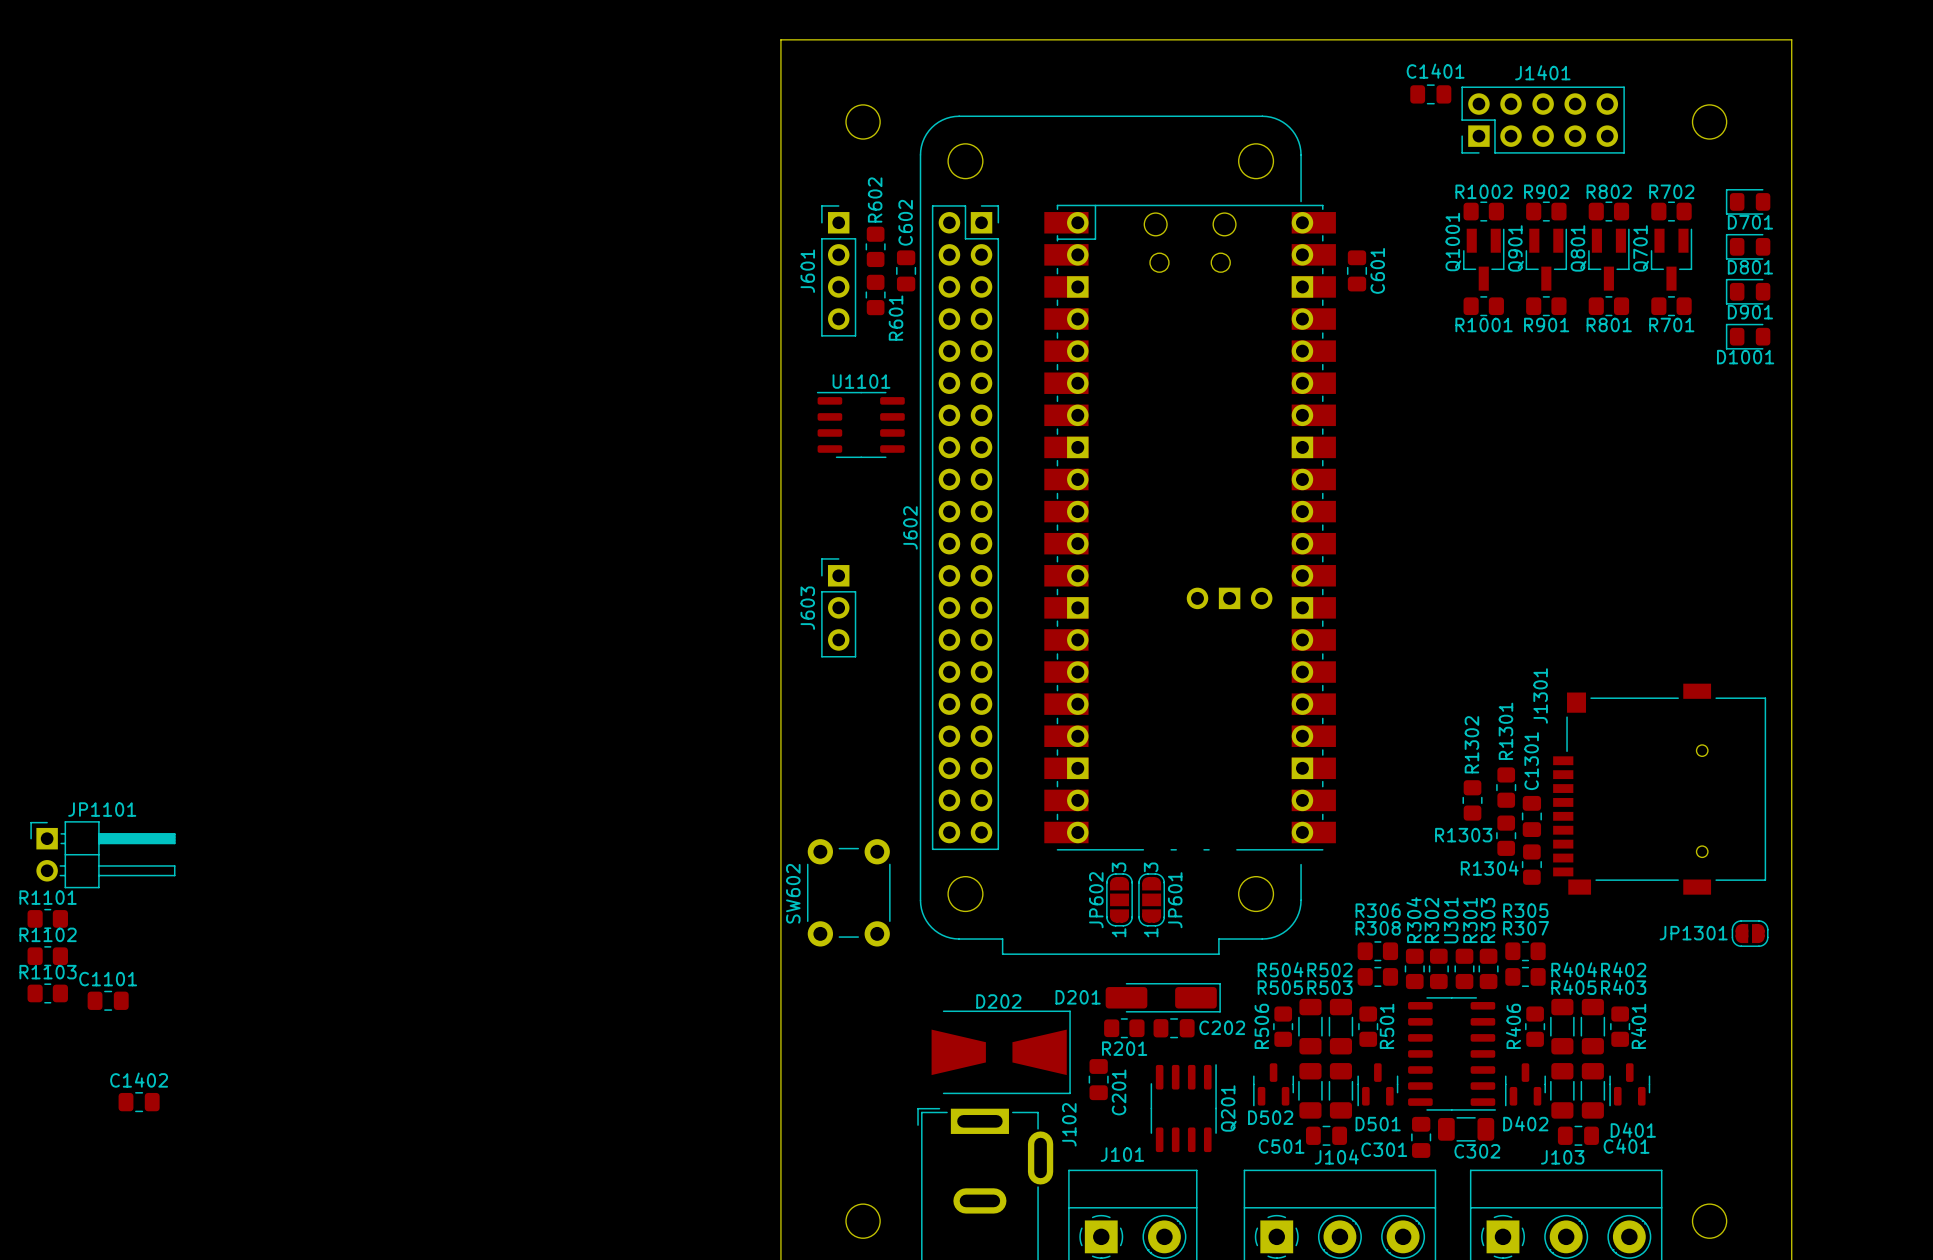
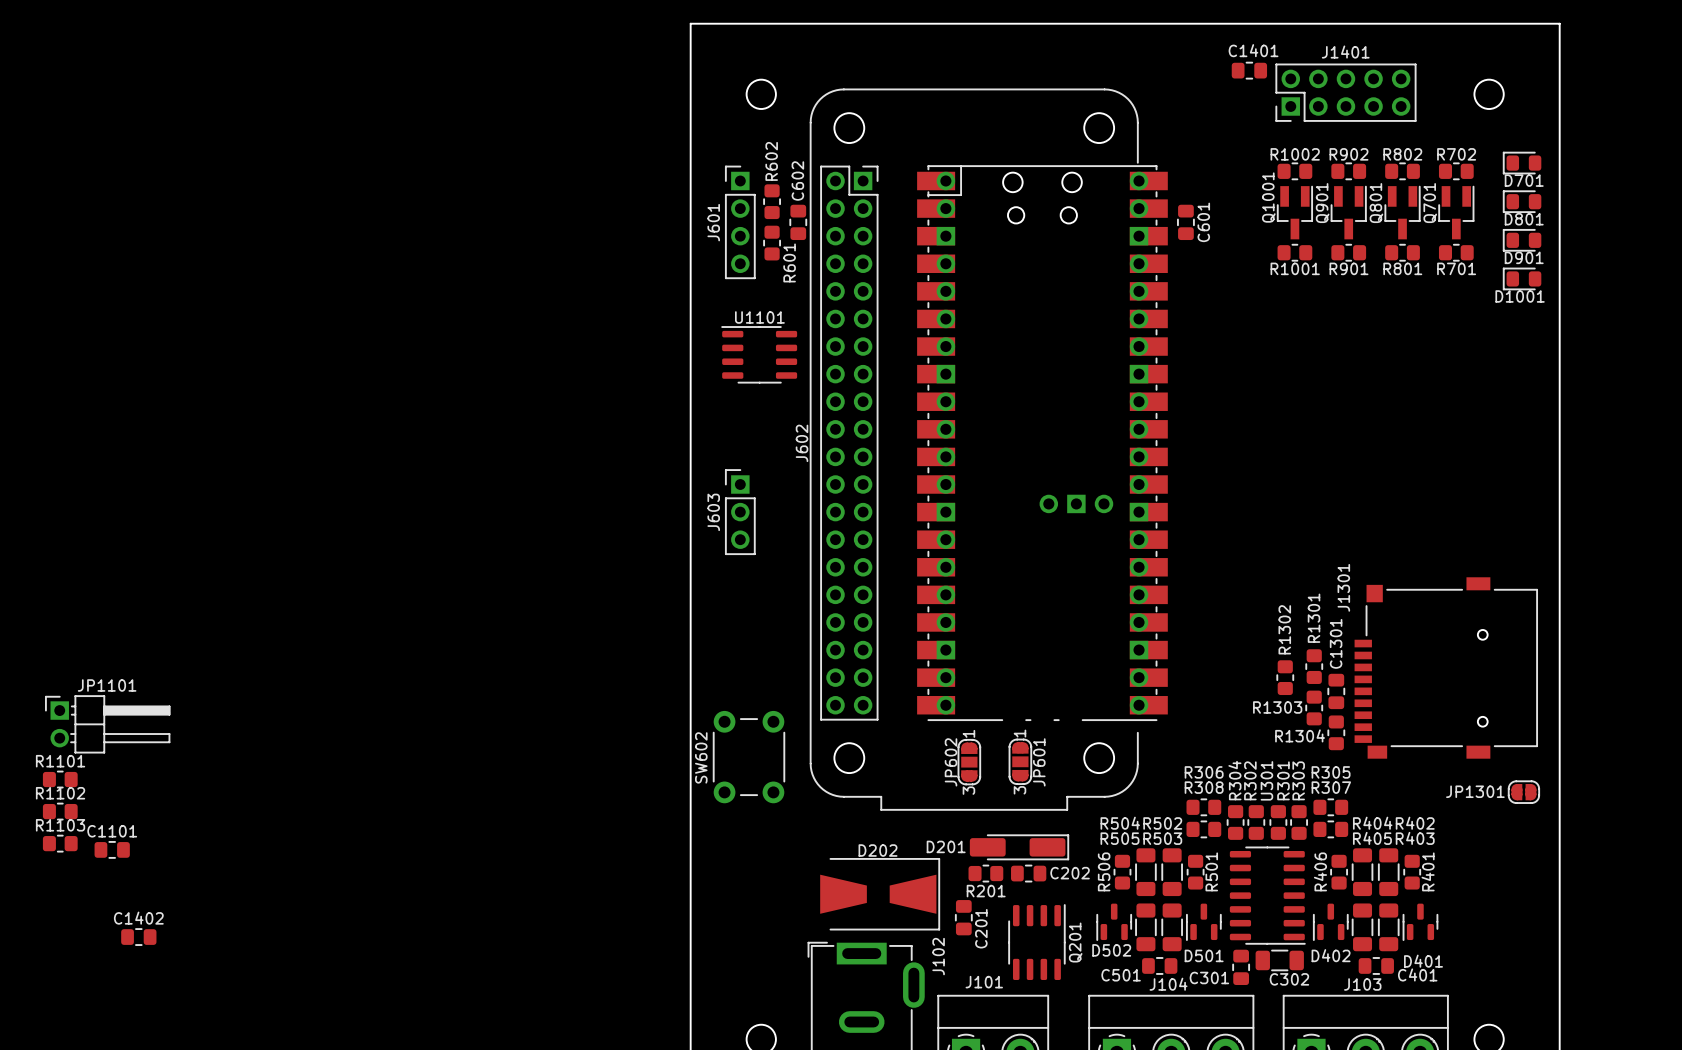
JP602 rotation: 0° (1119, 899) -> 180° (969, 762)
JP601 rotation: 0° (1151, 899) -> 180° (1020, 761)

